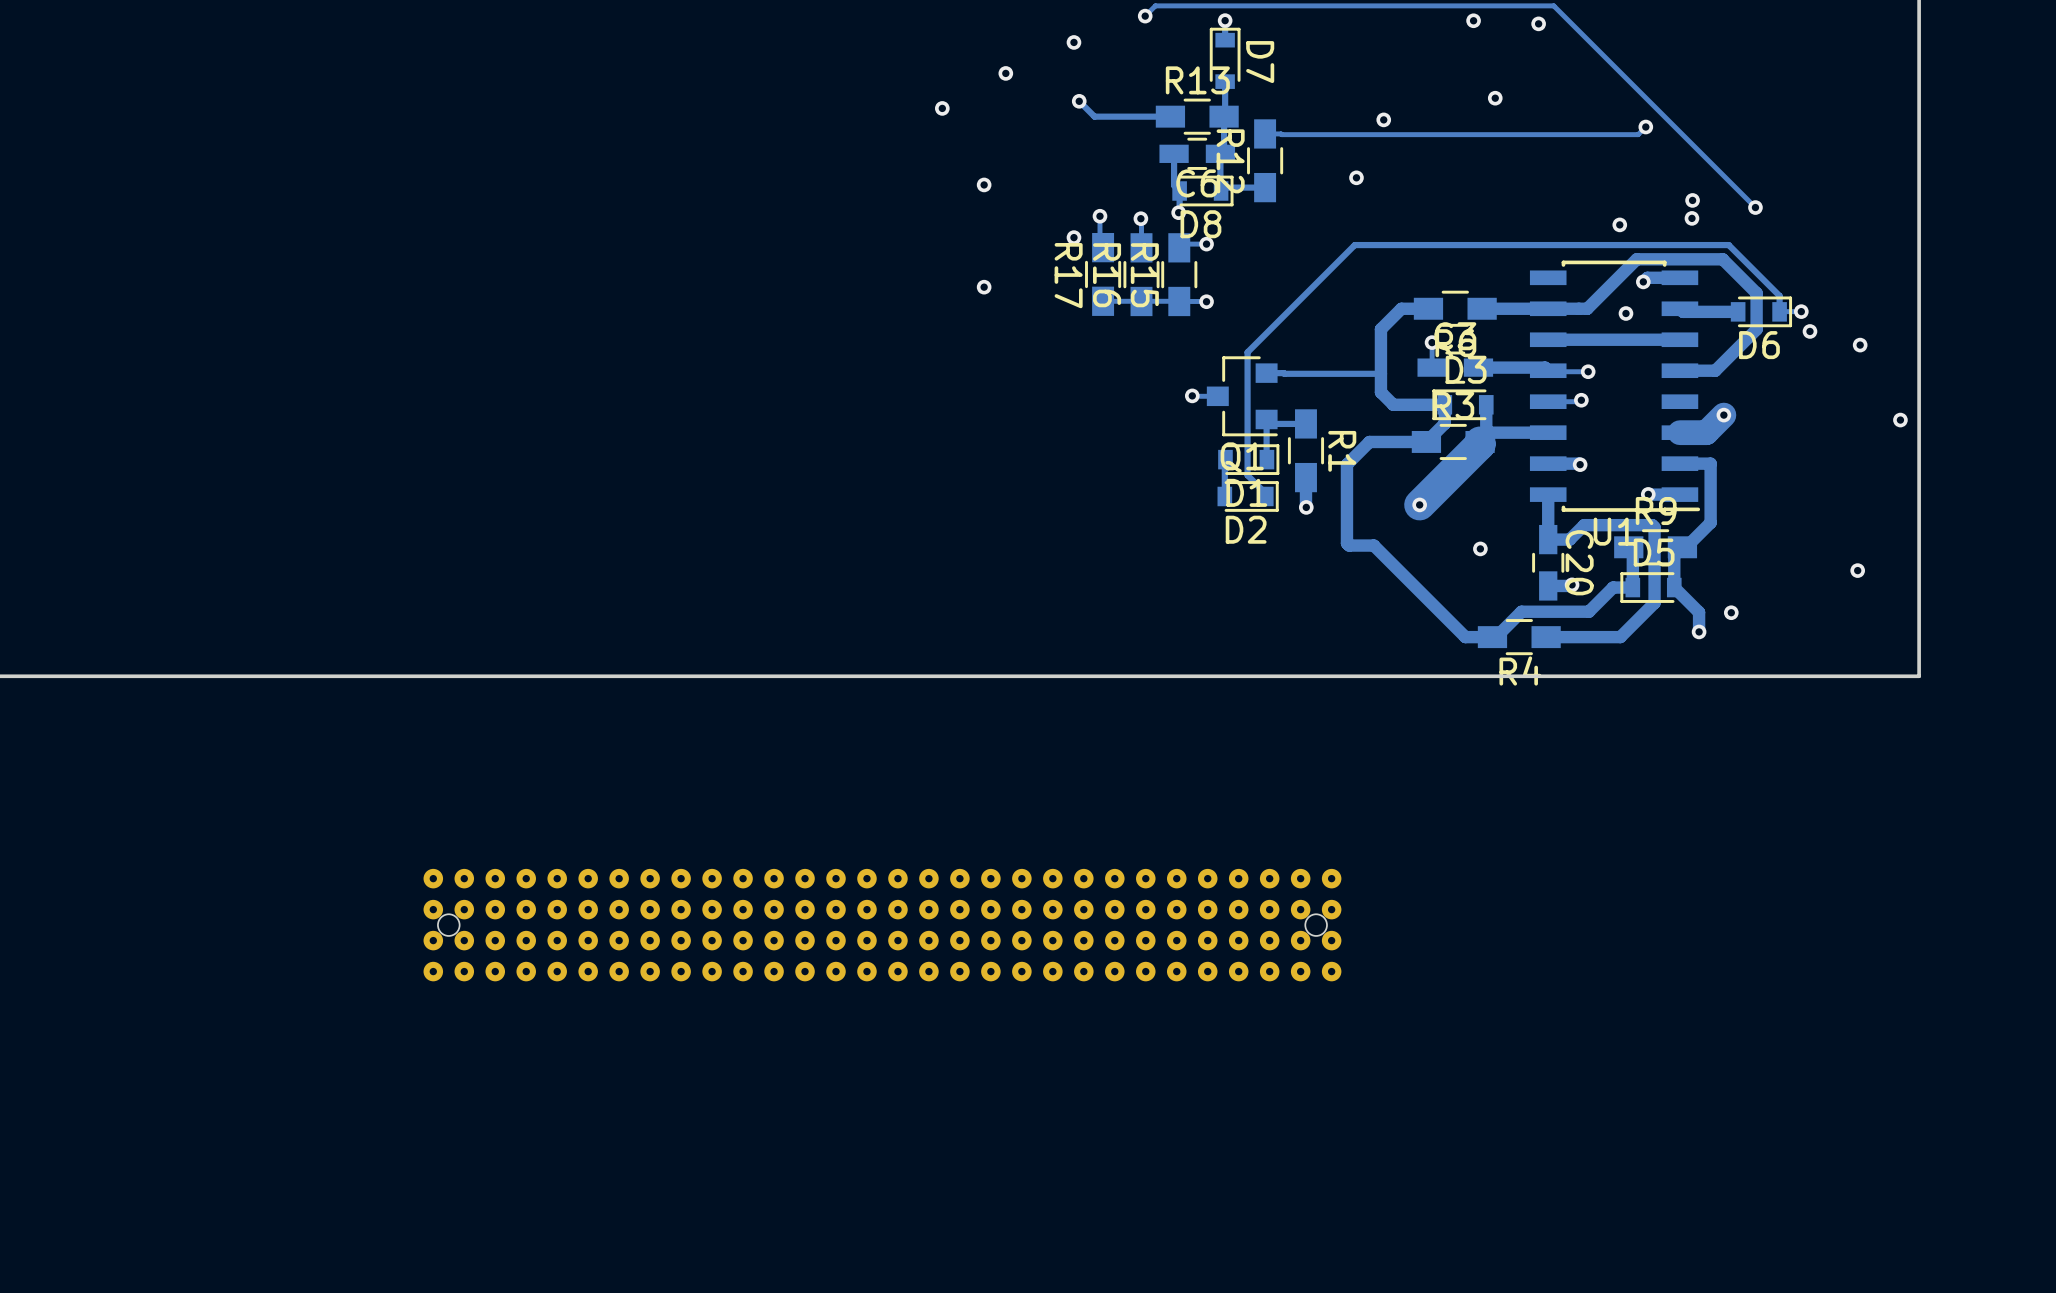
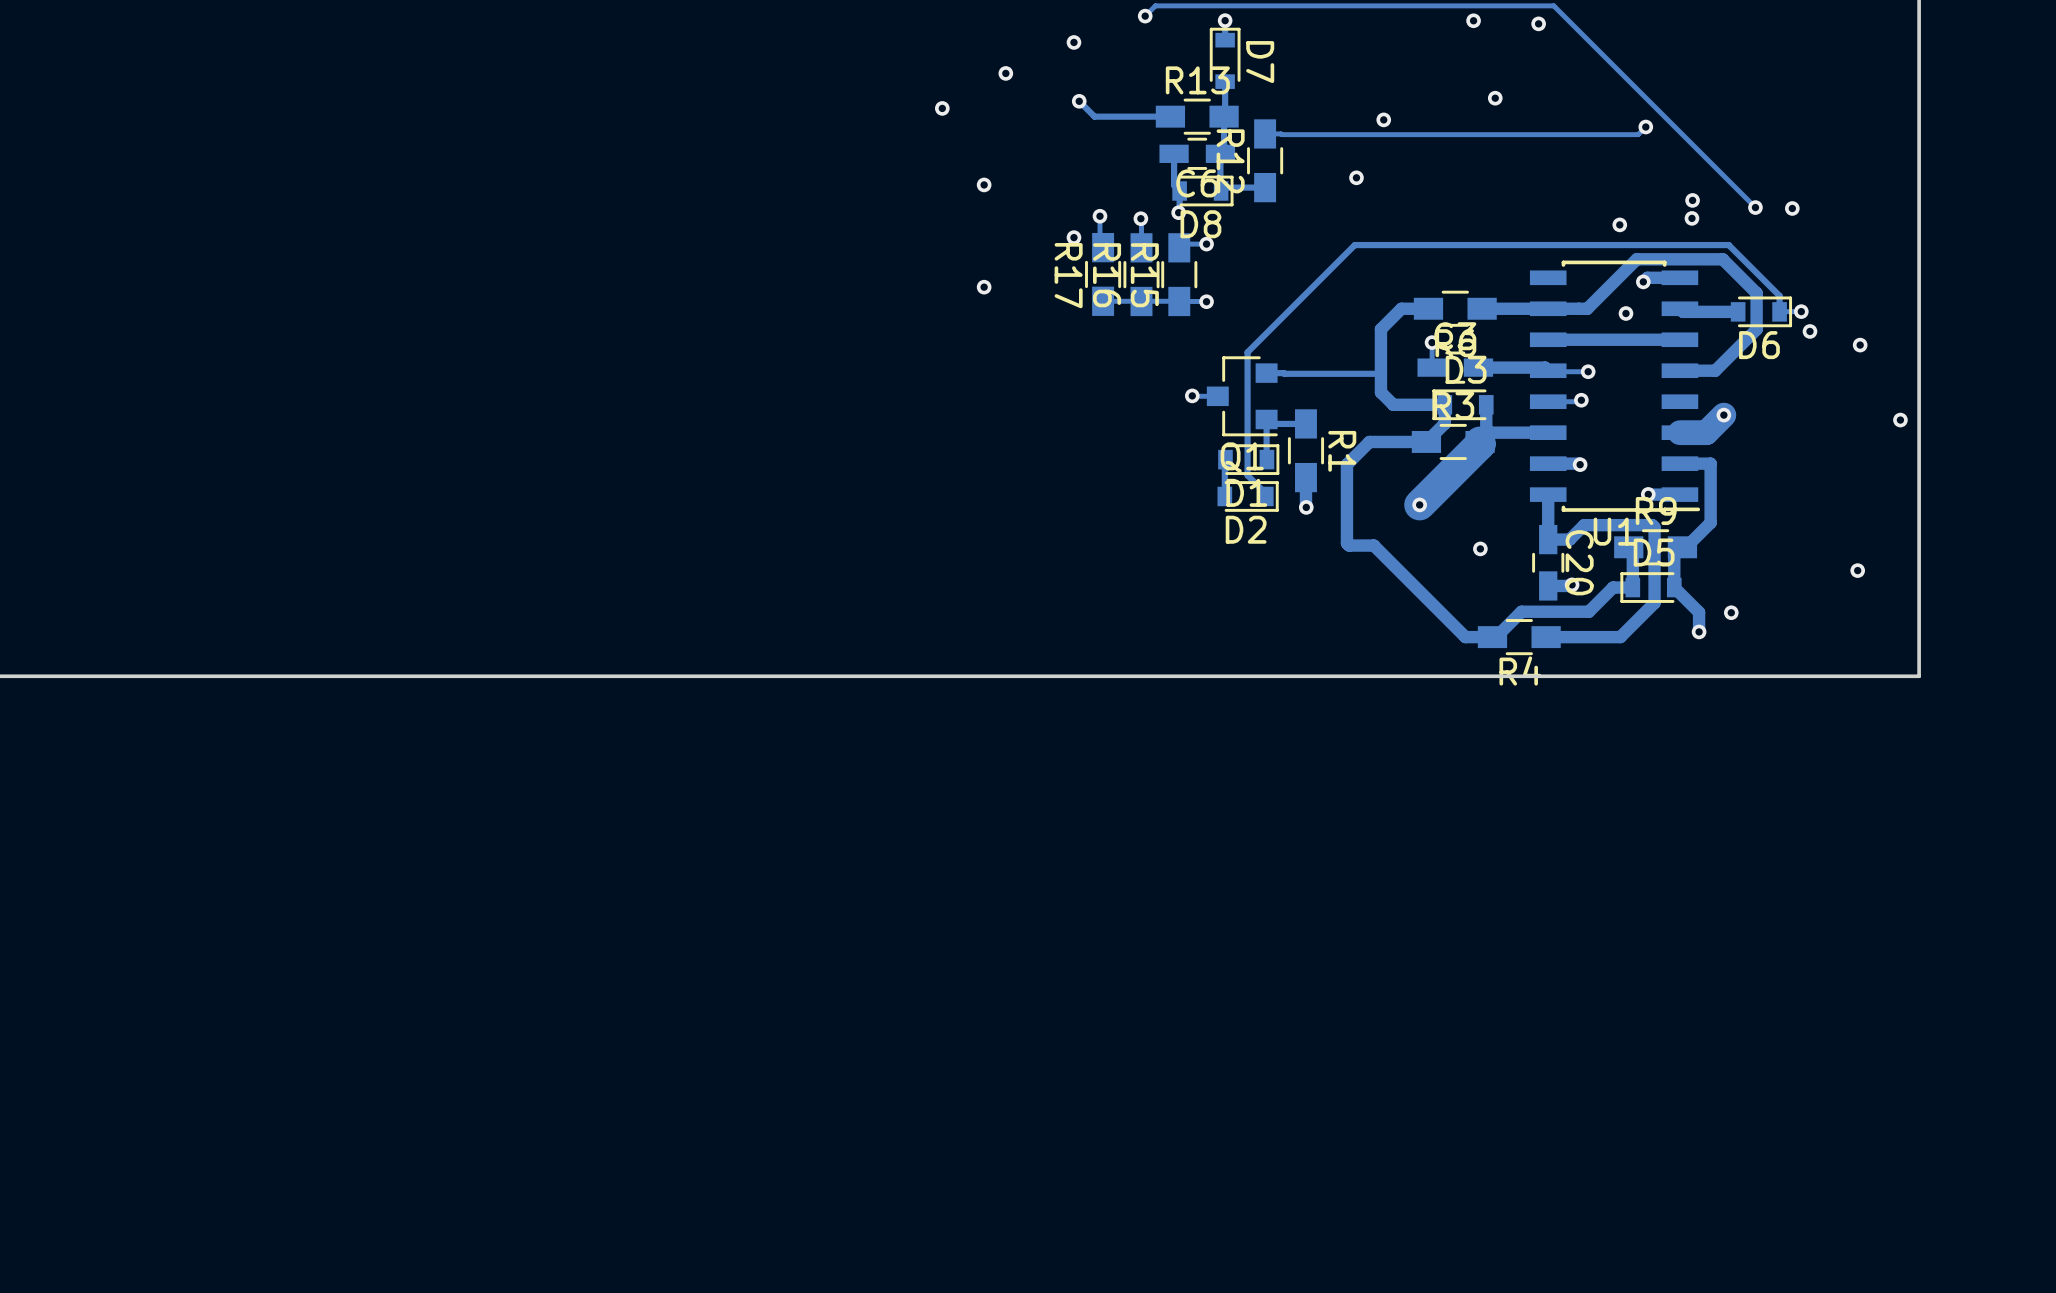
via: none -> (1792, 208)
part: (882, 925) -> none

